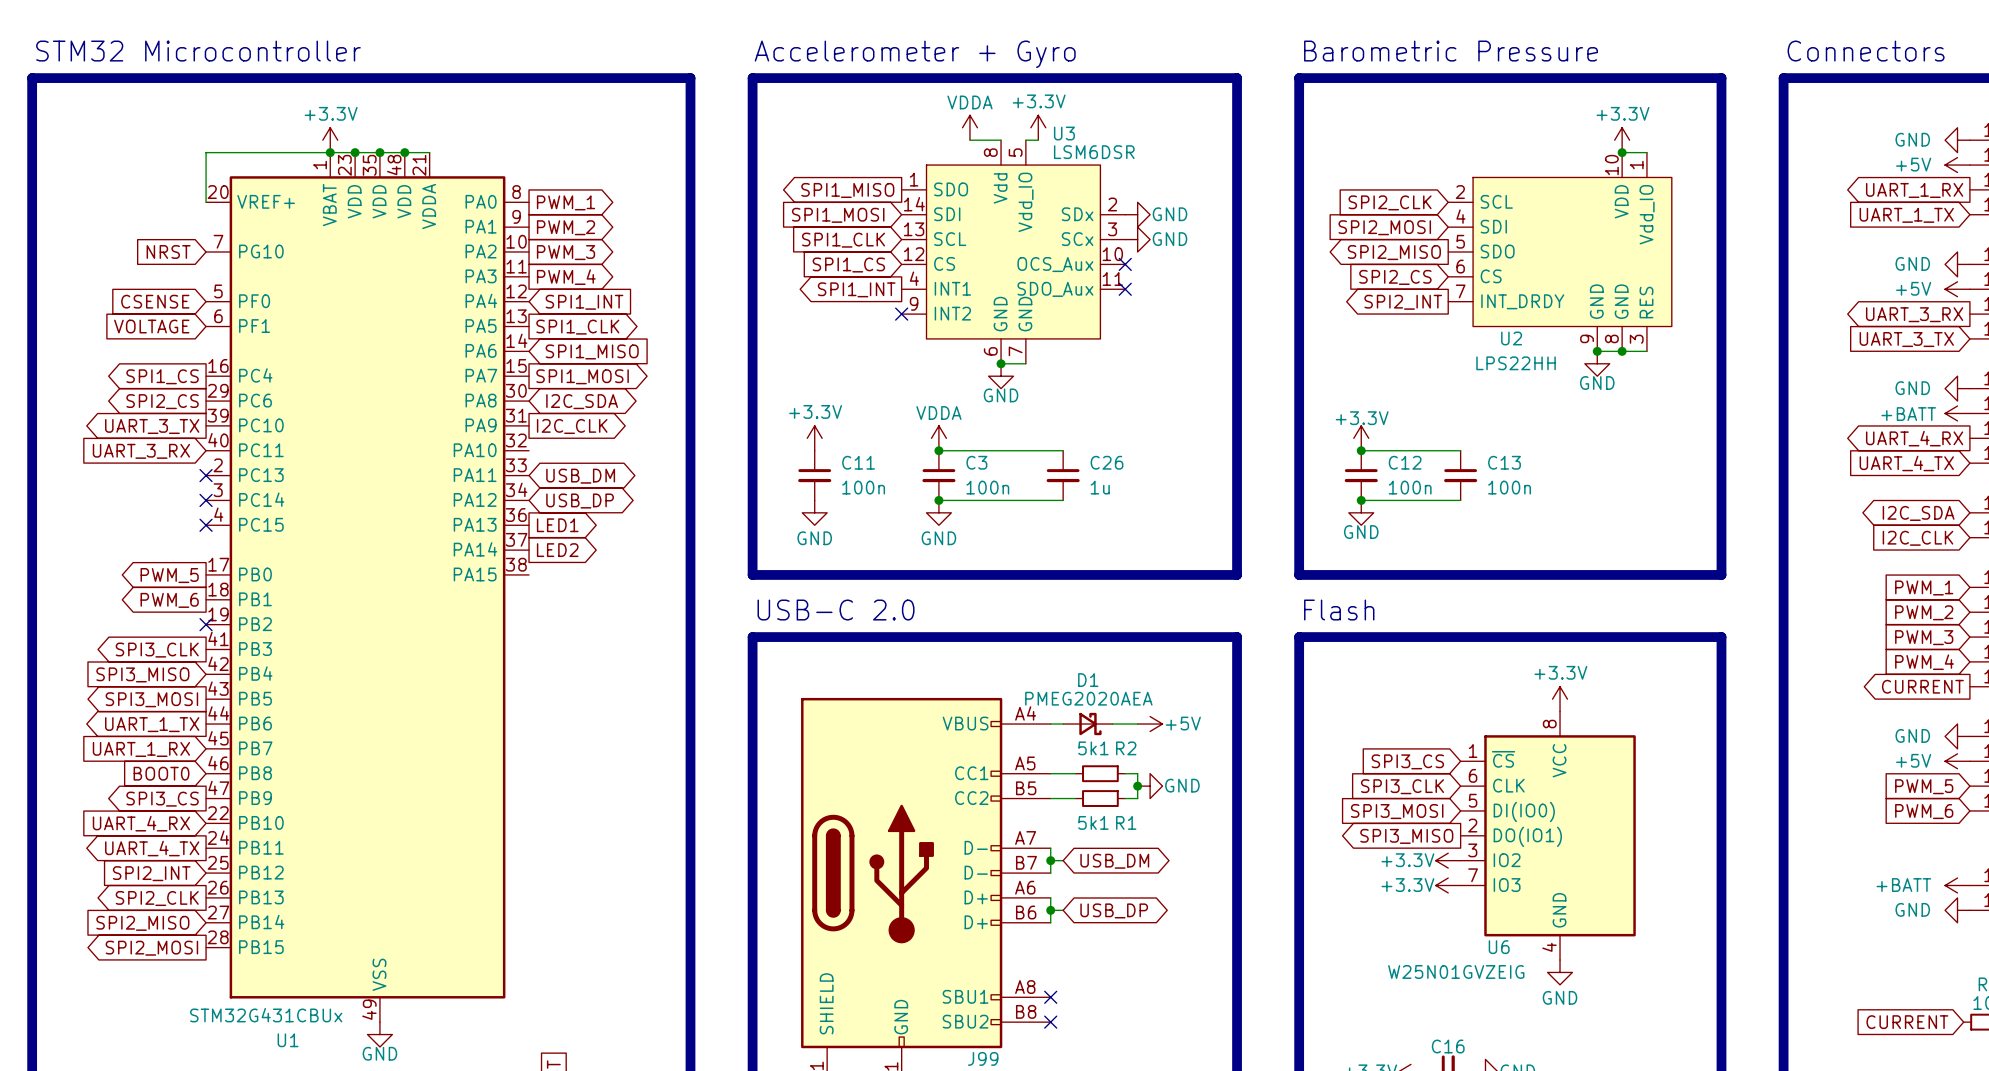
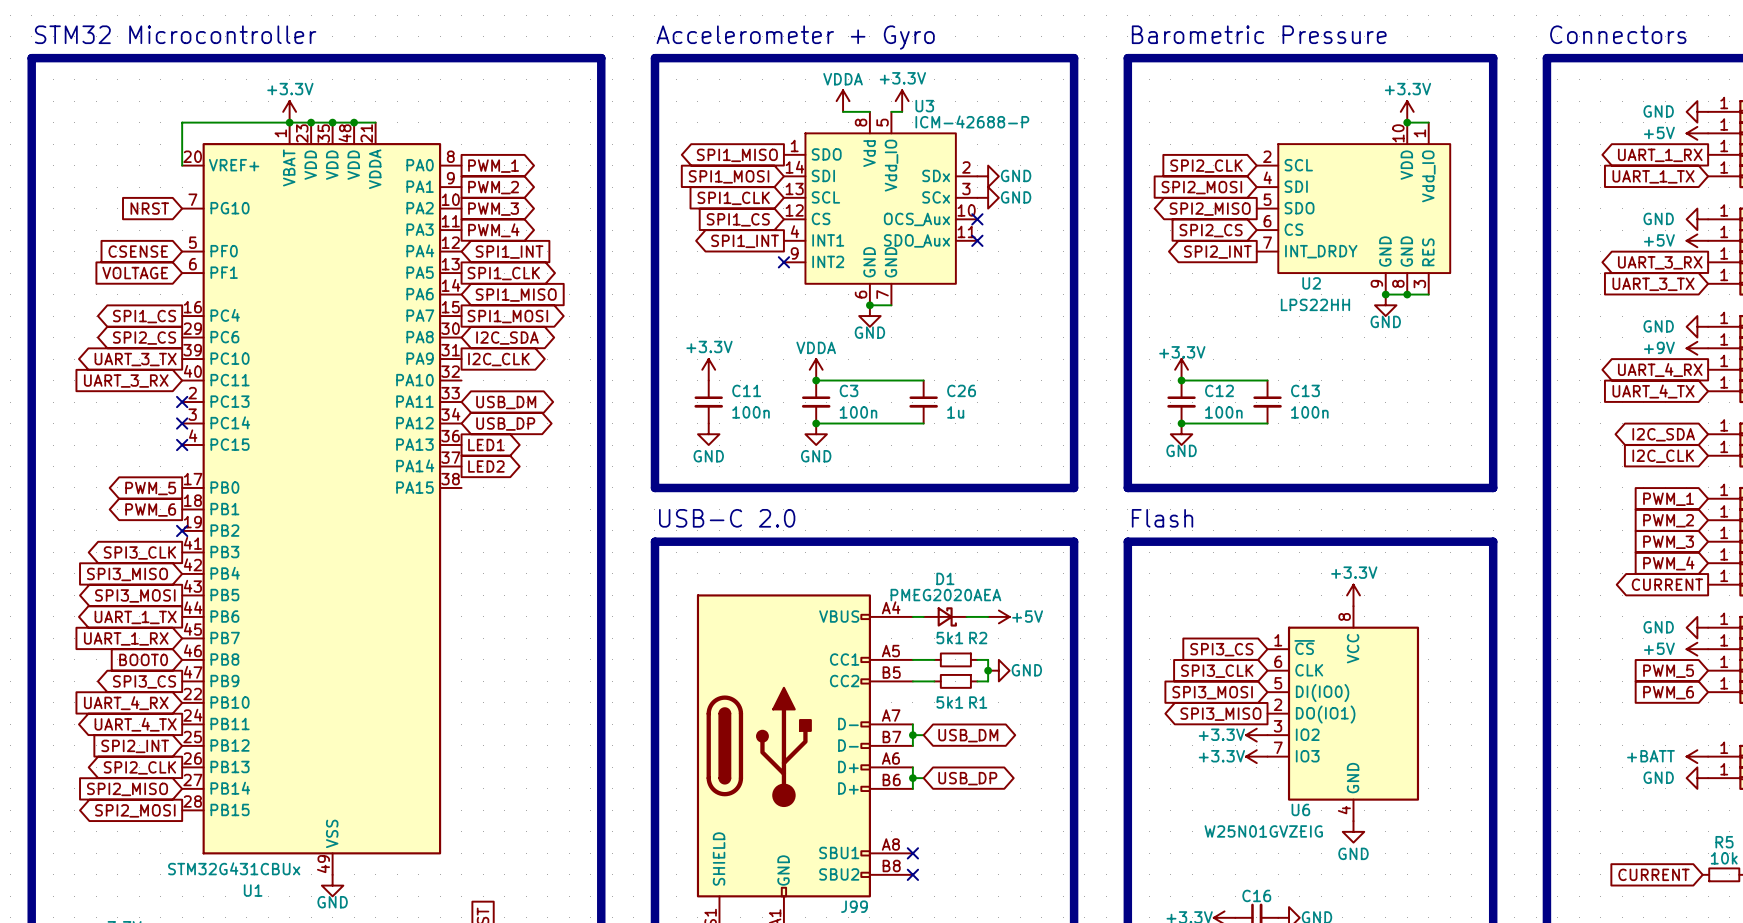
U3 value: LSM6DSR (1094, 152) -> ICM-42688-P (972, 121)
power symbol: +BATT (1957, 413) -> +9V (1697, 348)

